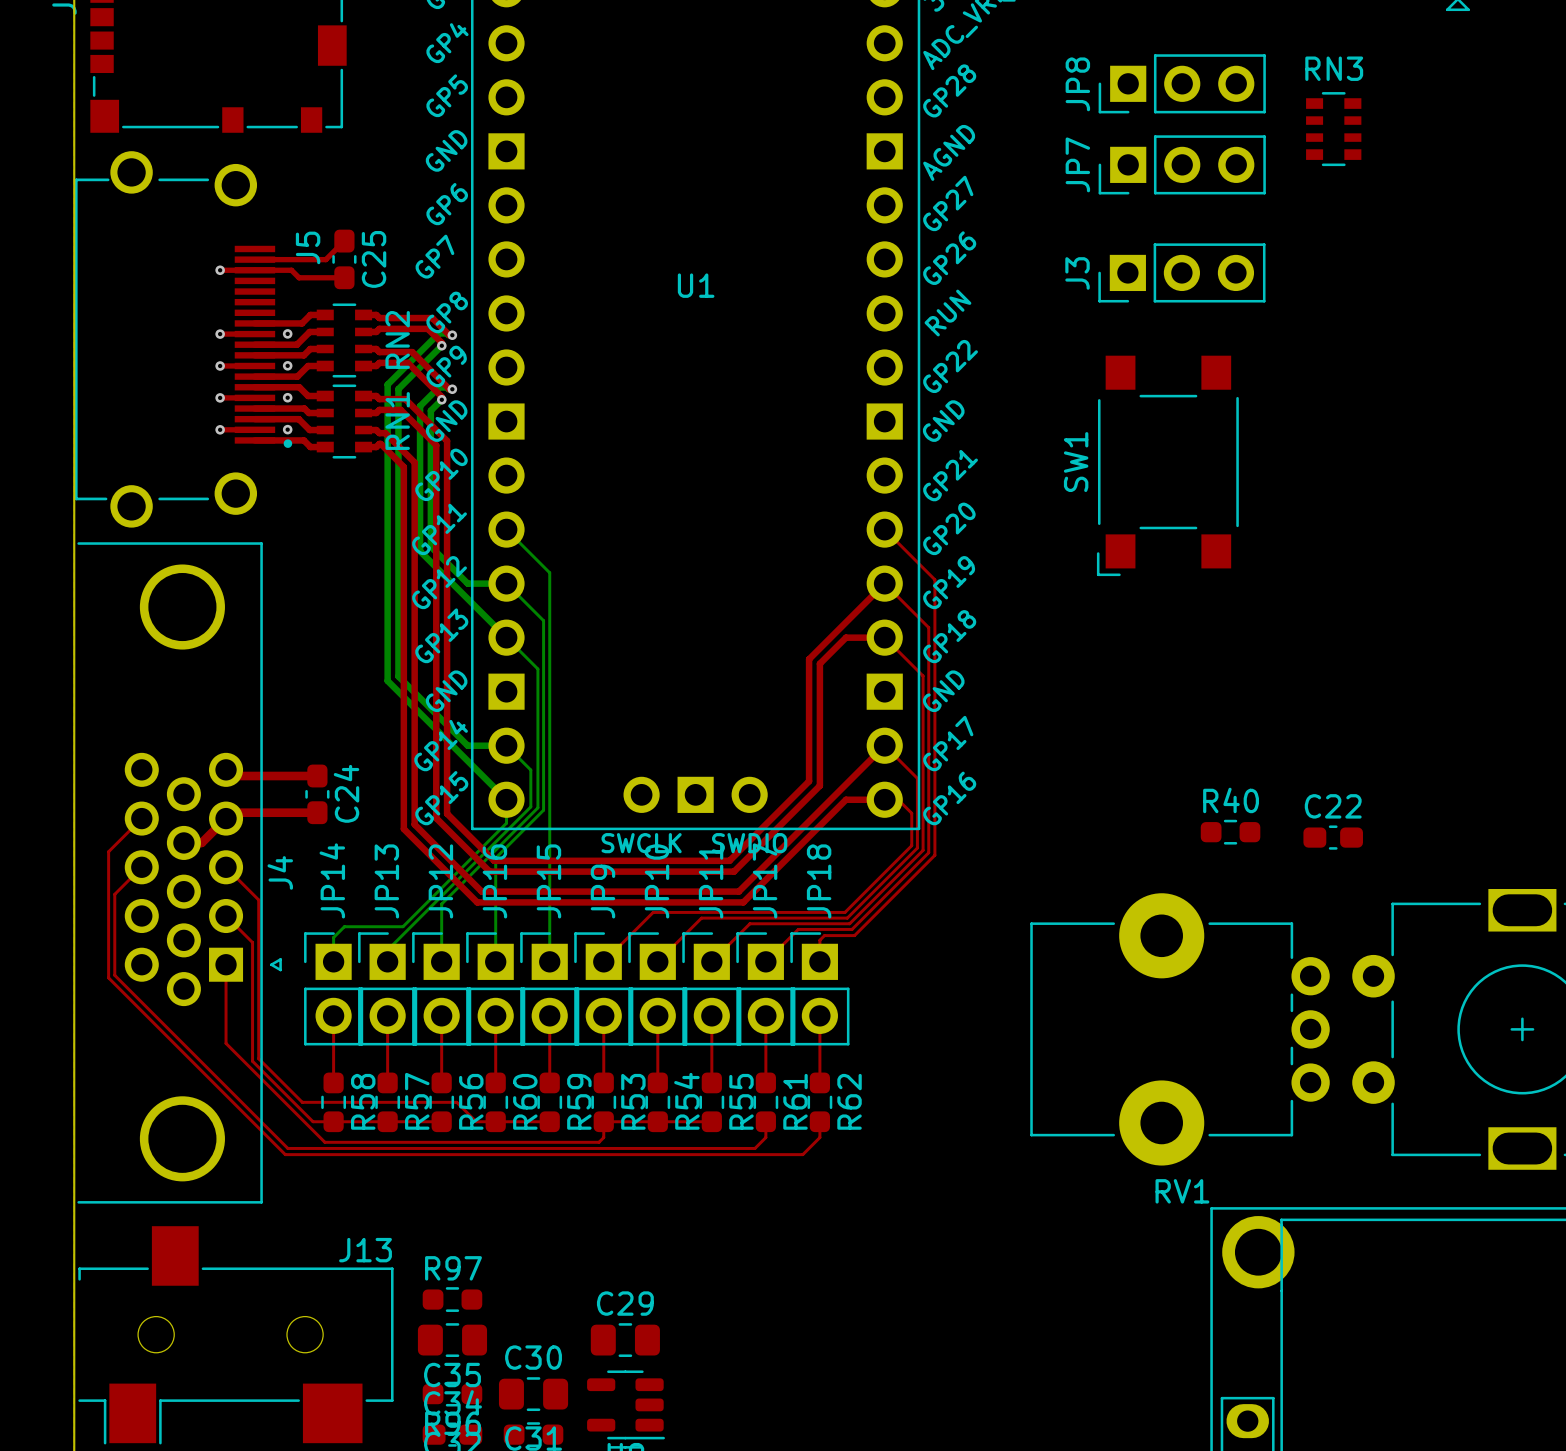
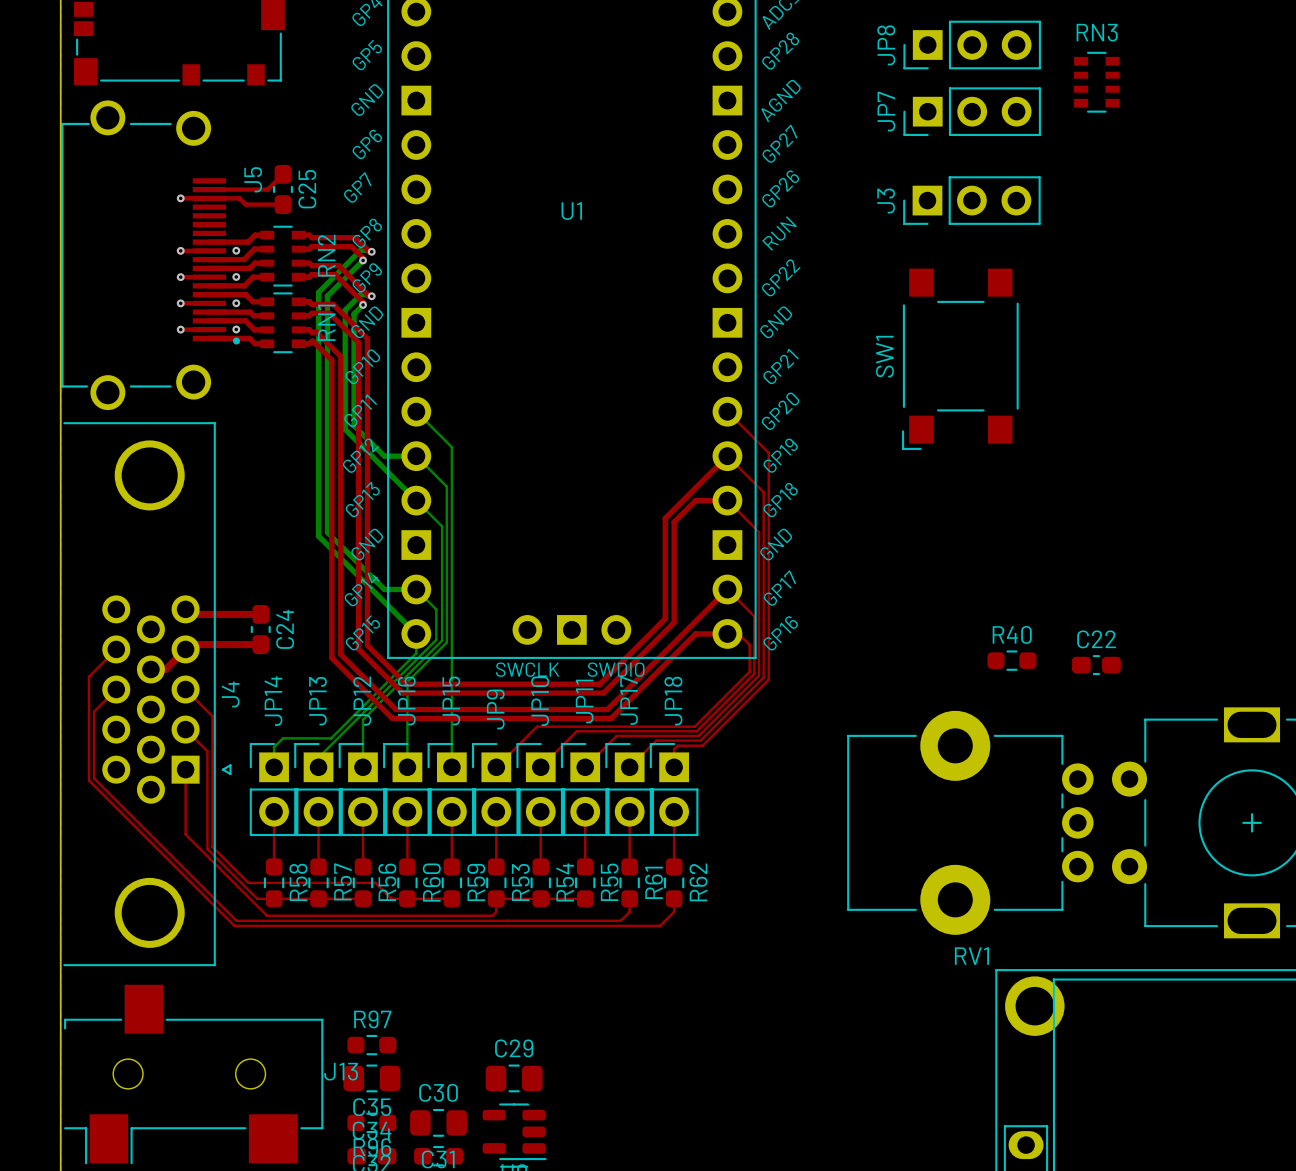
J13 name position: J13 (365, 1250) -> J13 (341, 1071)

